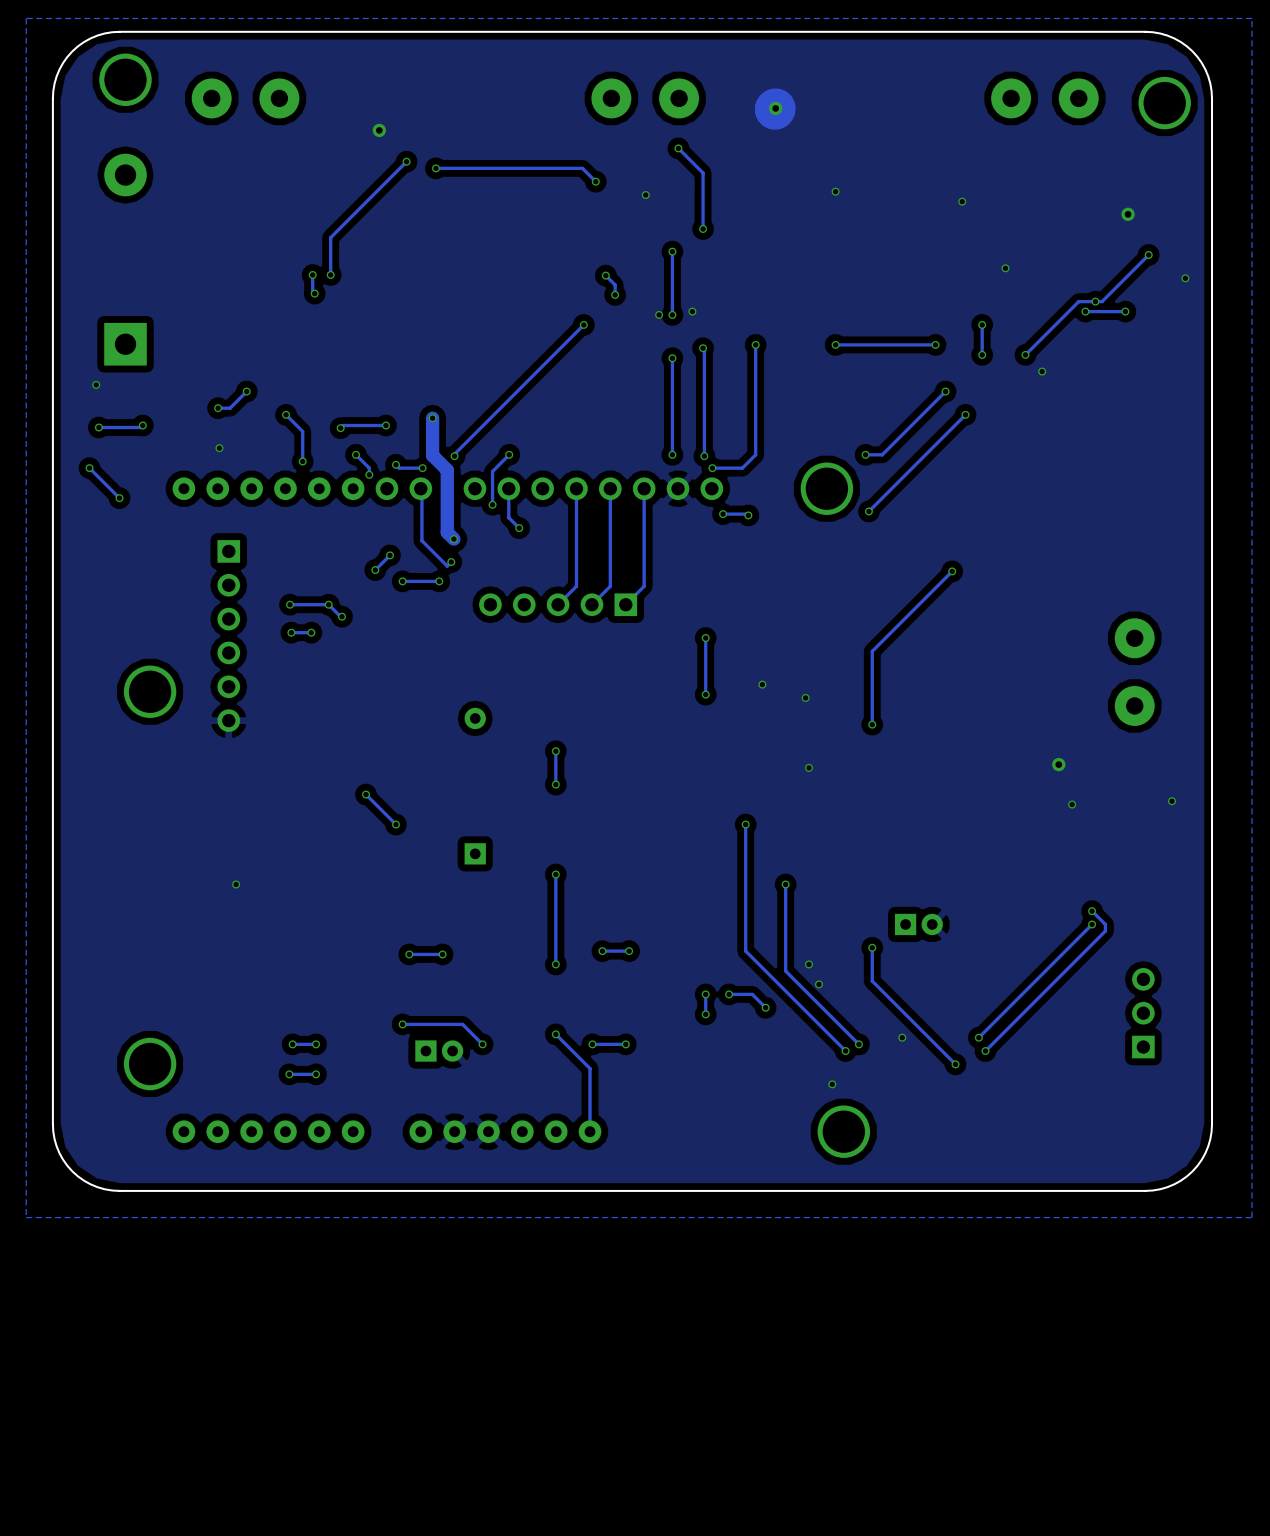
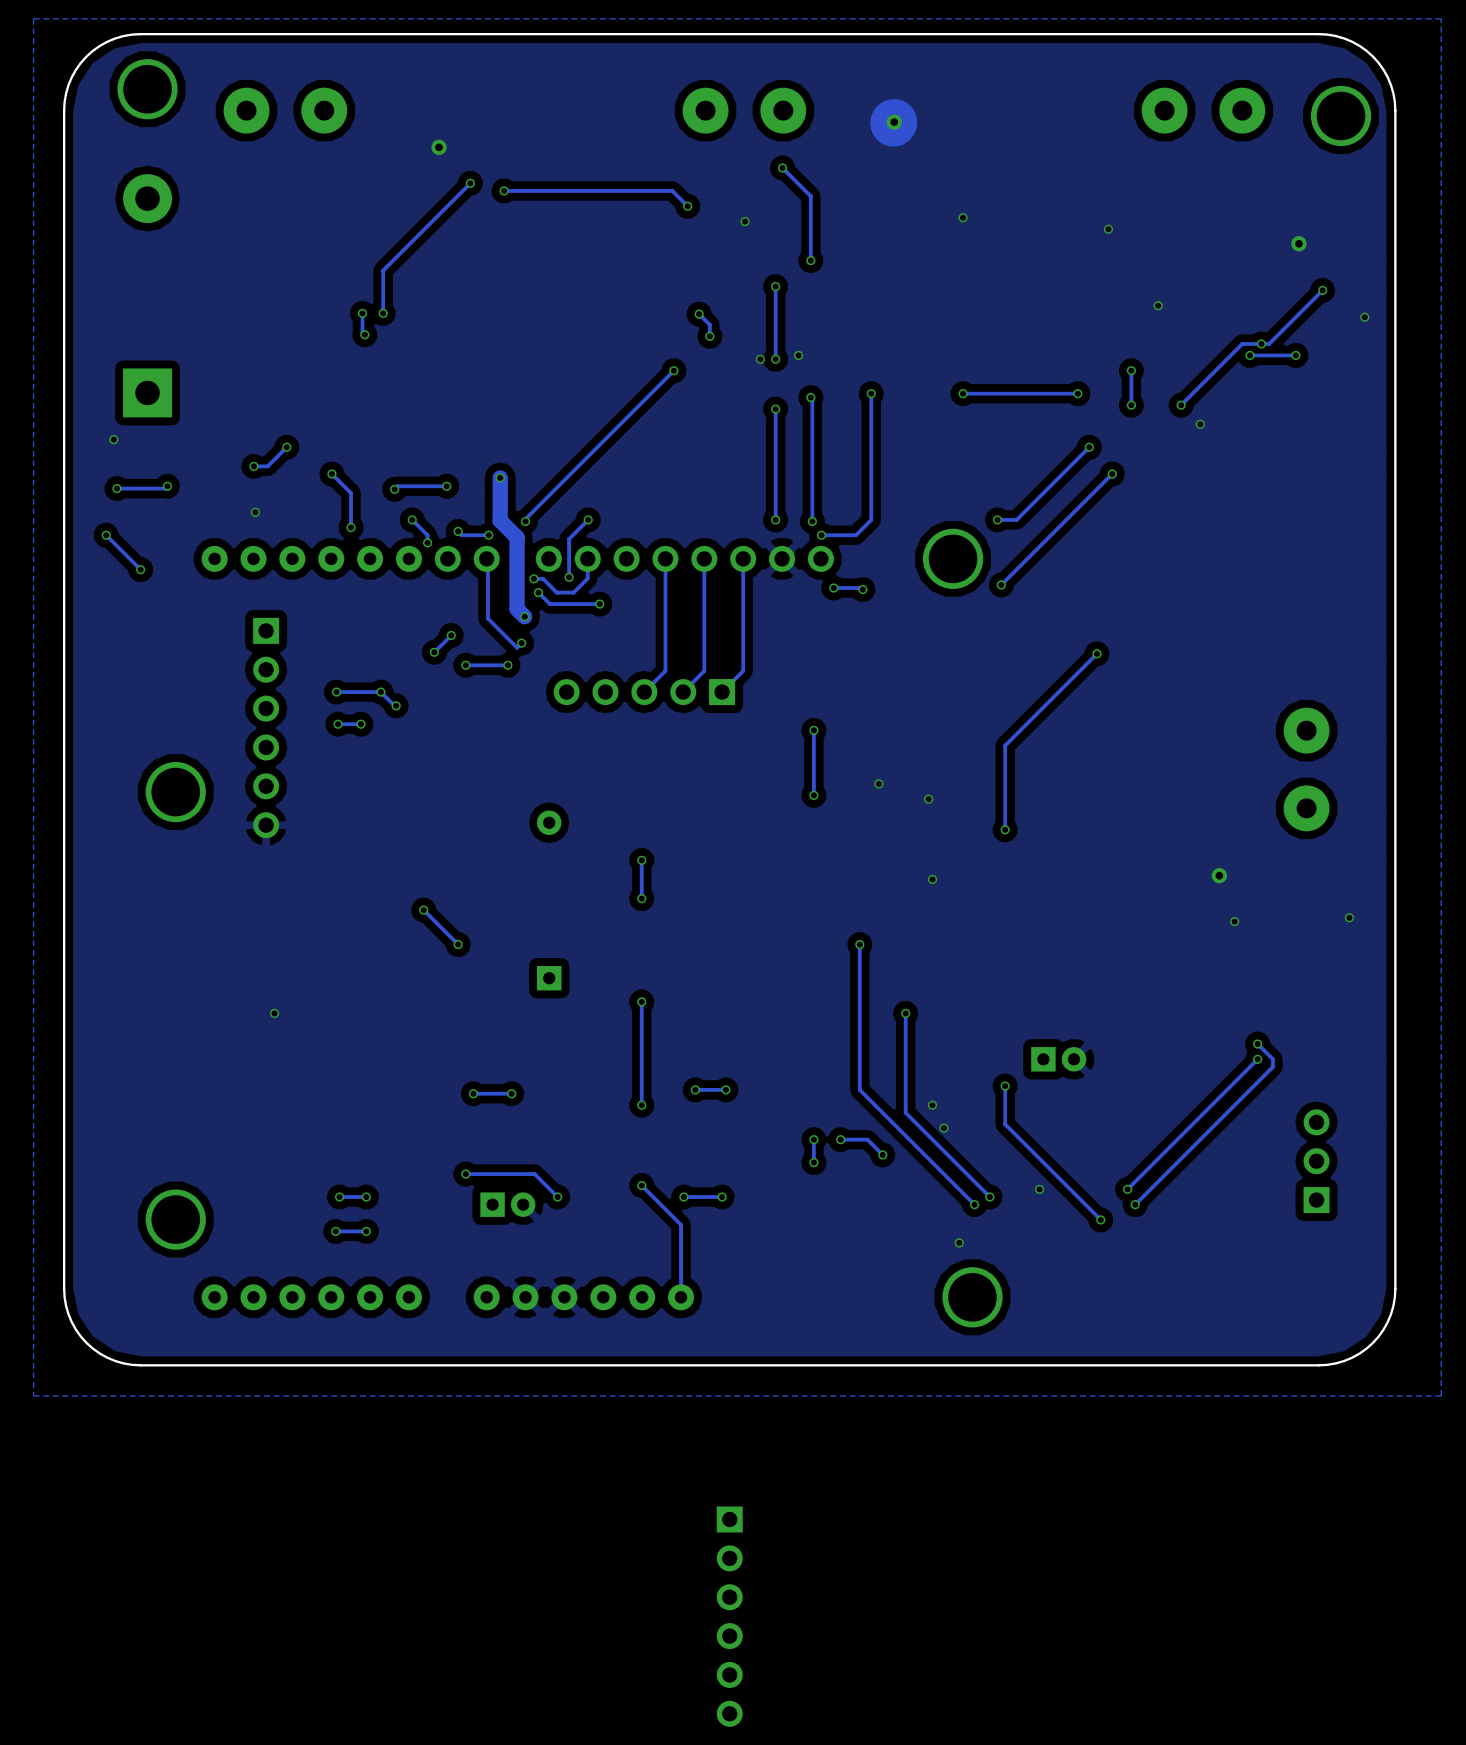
track: (508, 505) (508, 517) (519, 528) -> (538, 592) (549, 604) (599, 604)
track: none -> (587, 578) (573, 592) (556, 592) (543, 578) (533, 578)
via: none -> (533, 578)
via: none -> (538, 592)
part: none -> (729, 1616)

